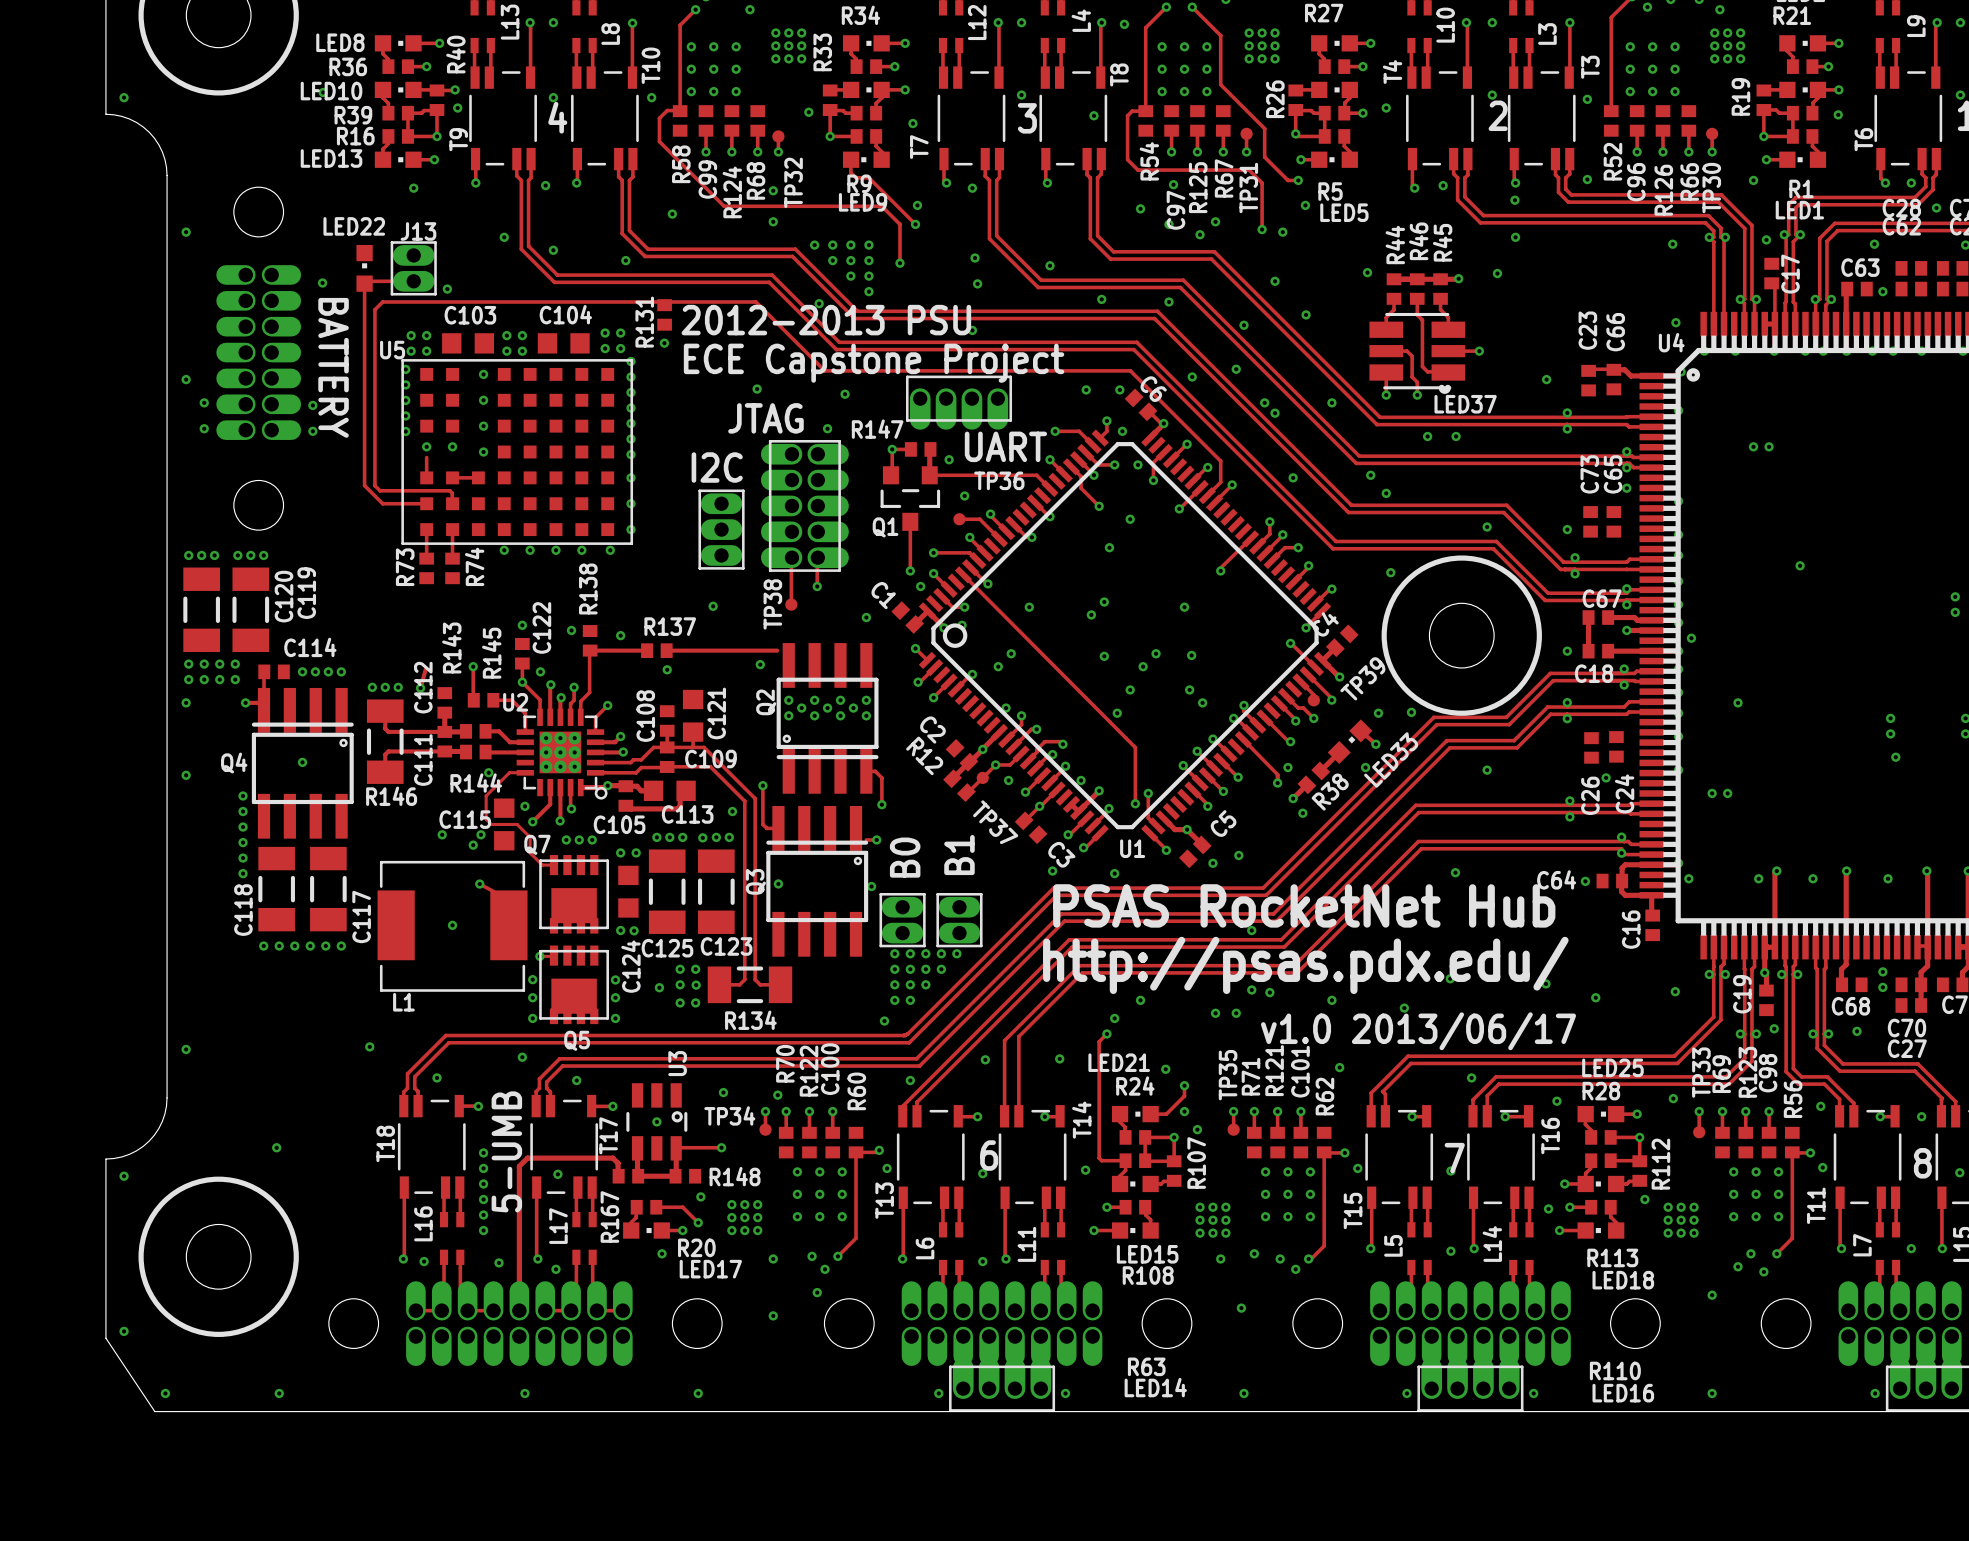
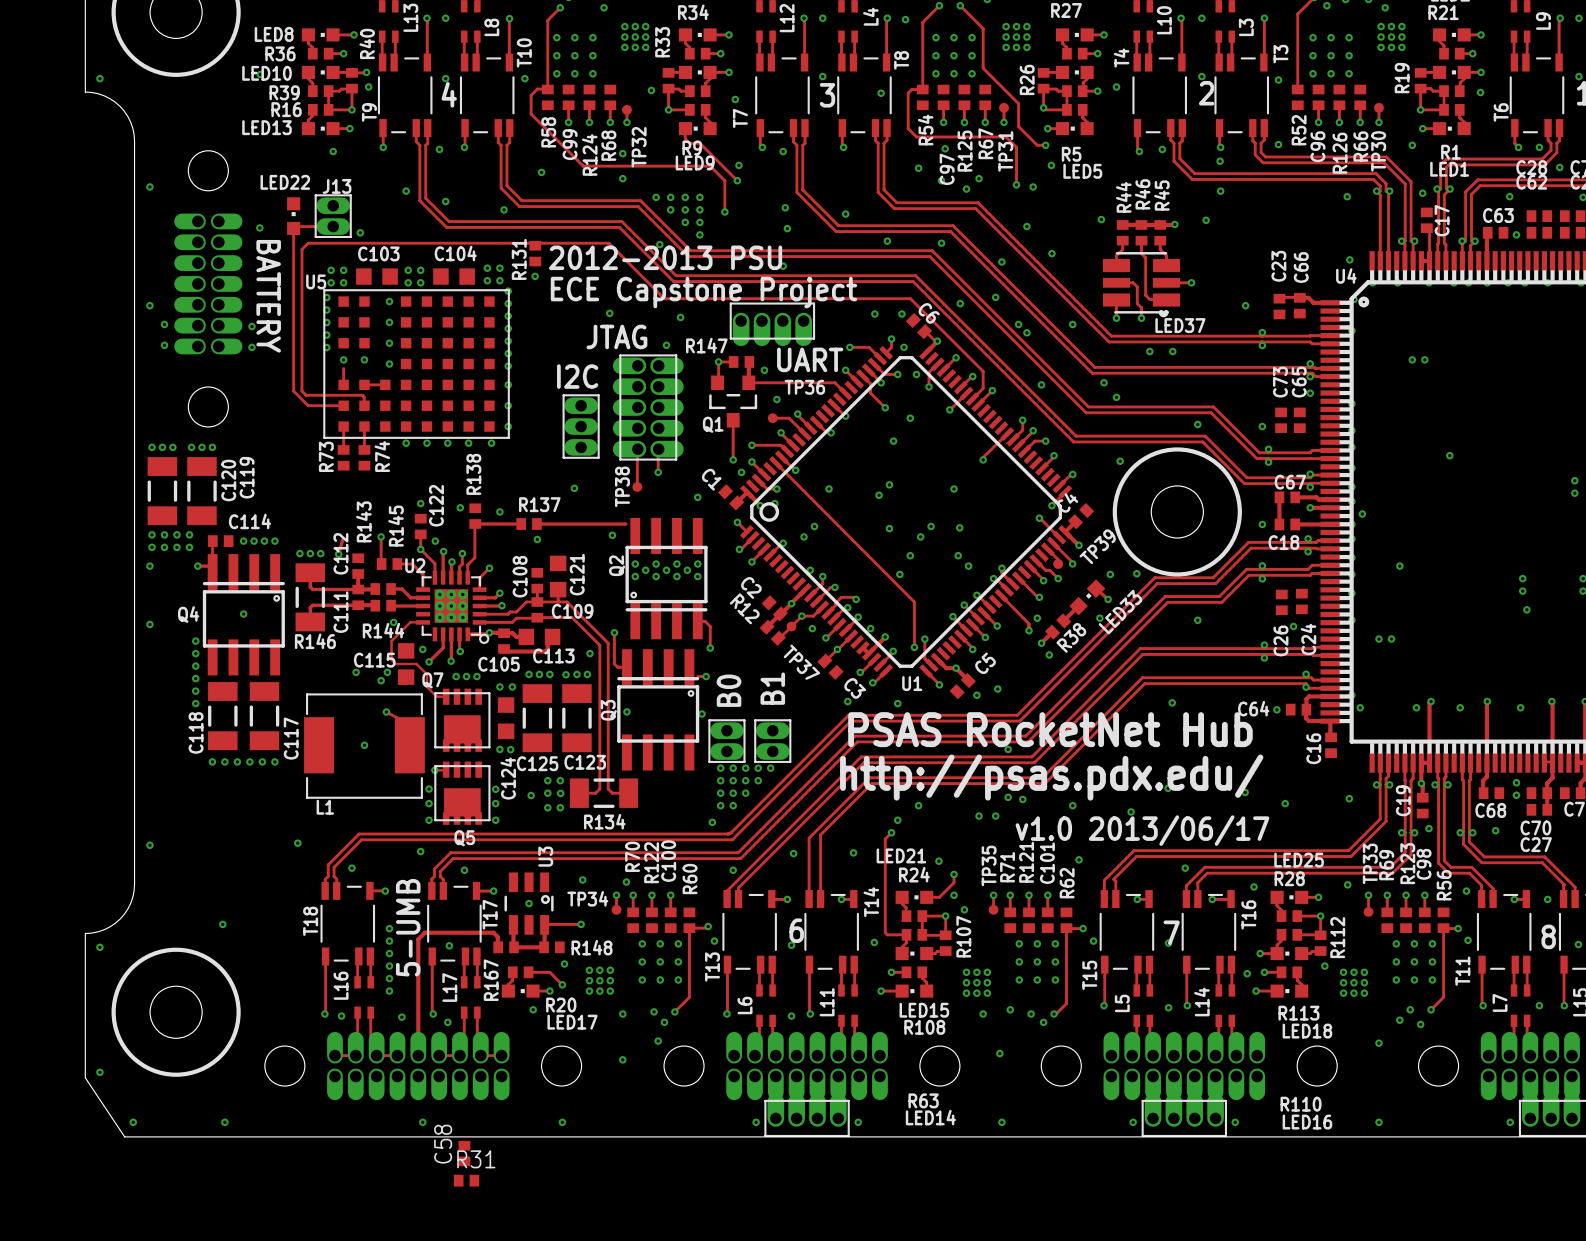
C58: none -> (464, 1153)
R31: none -> (466, 1180)

